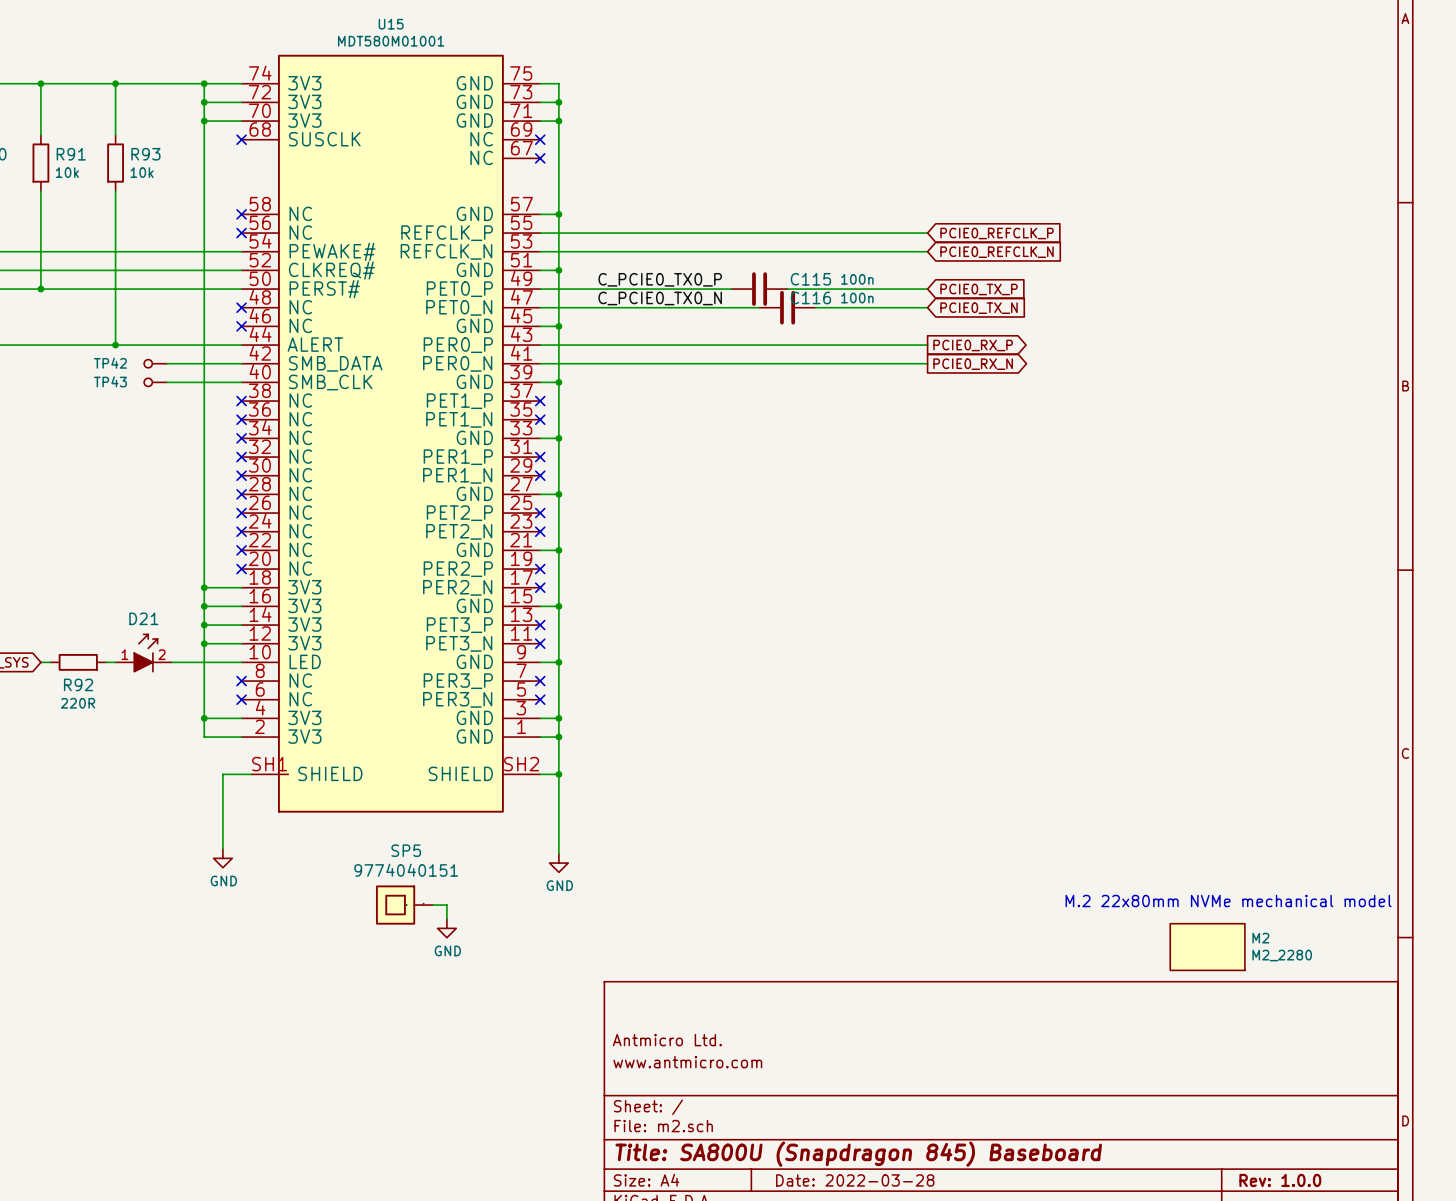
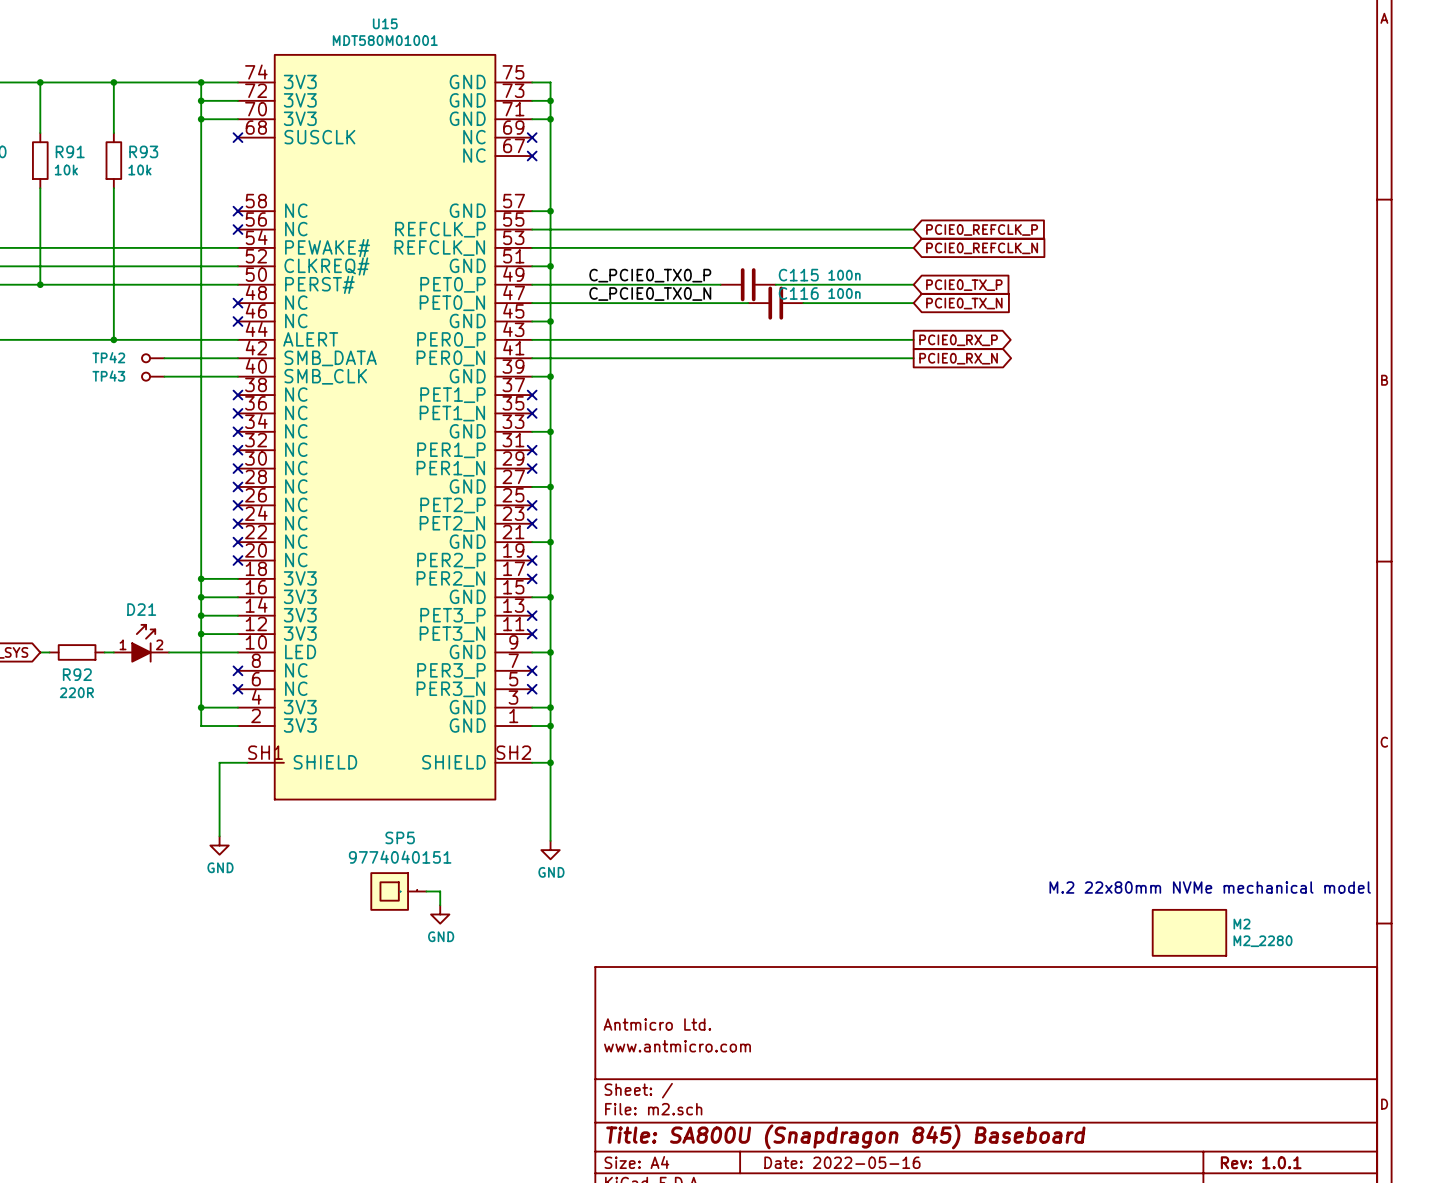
title block: Date: 2022-03-28 (855, 1180) -> Date: 2022-05-16 (842, 1162)
title block: Rev: 1.0.0 (1280, 1180) -> Rev: 1.0.1 (1261, 1162)

